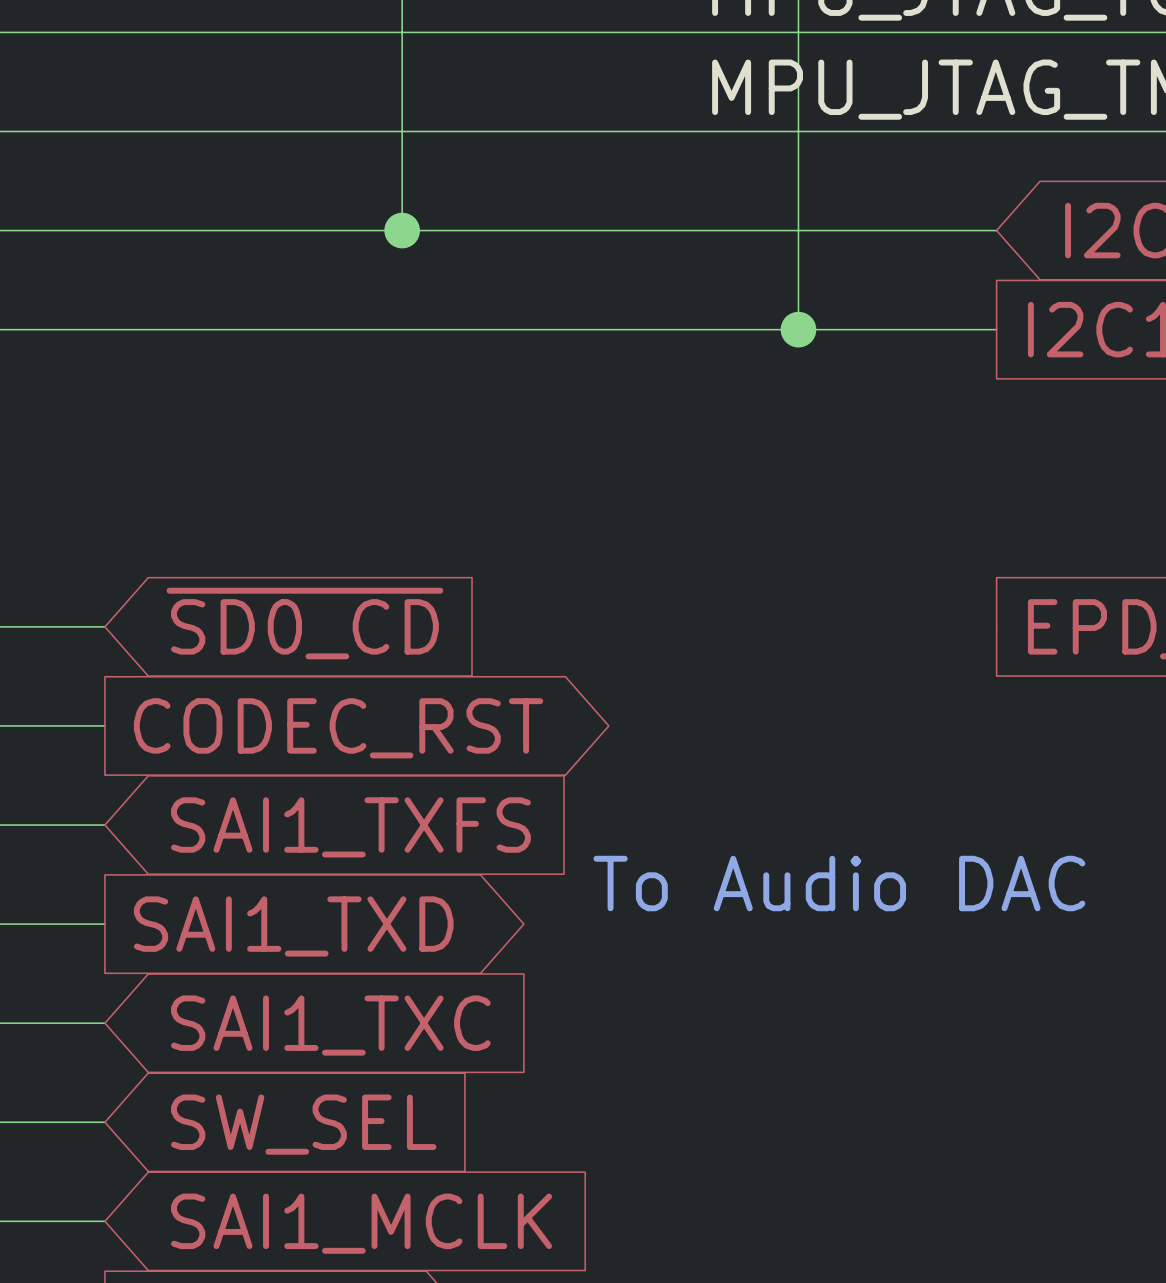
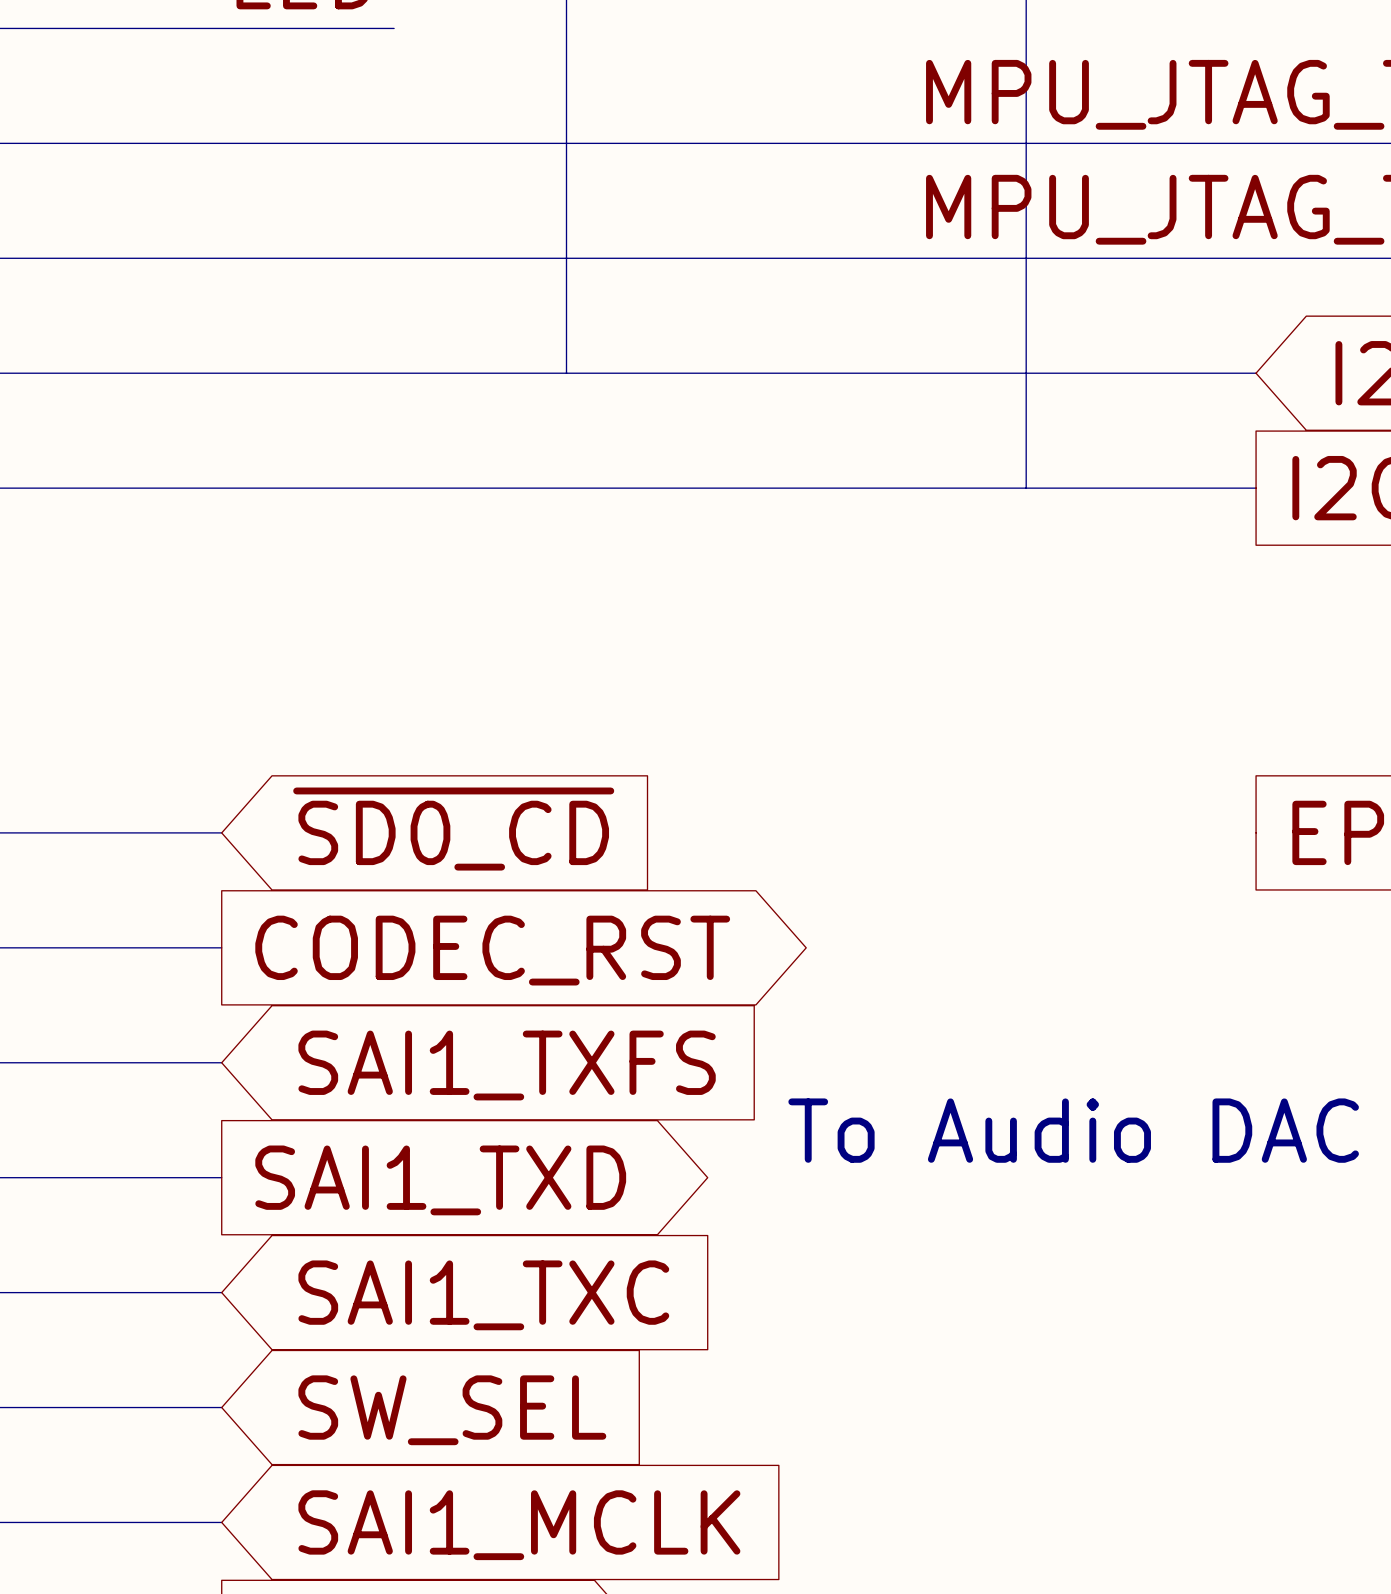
junction: (402, 230) -> none
junction: (798, 329) -> none

